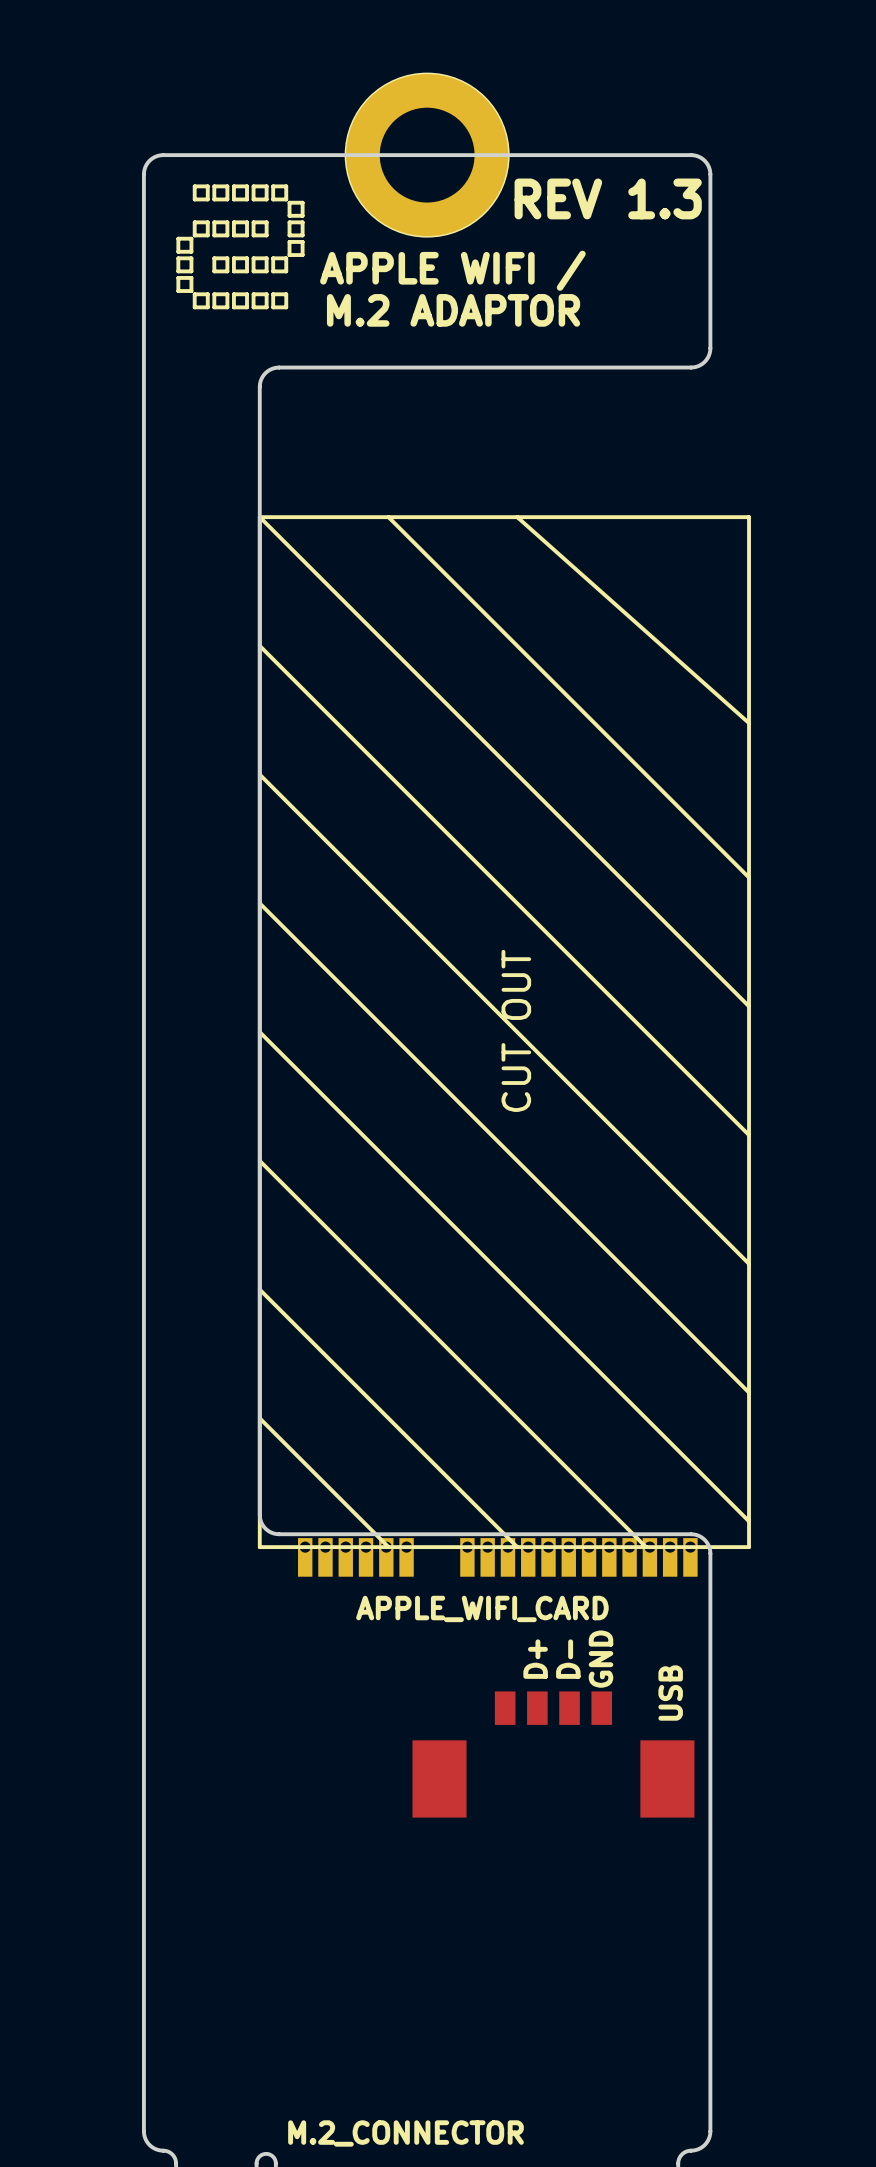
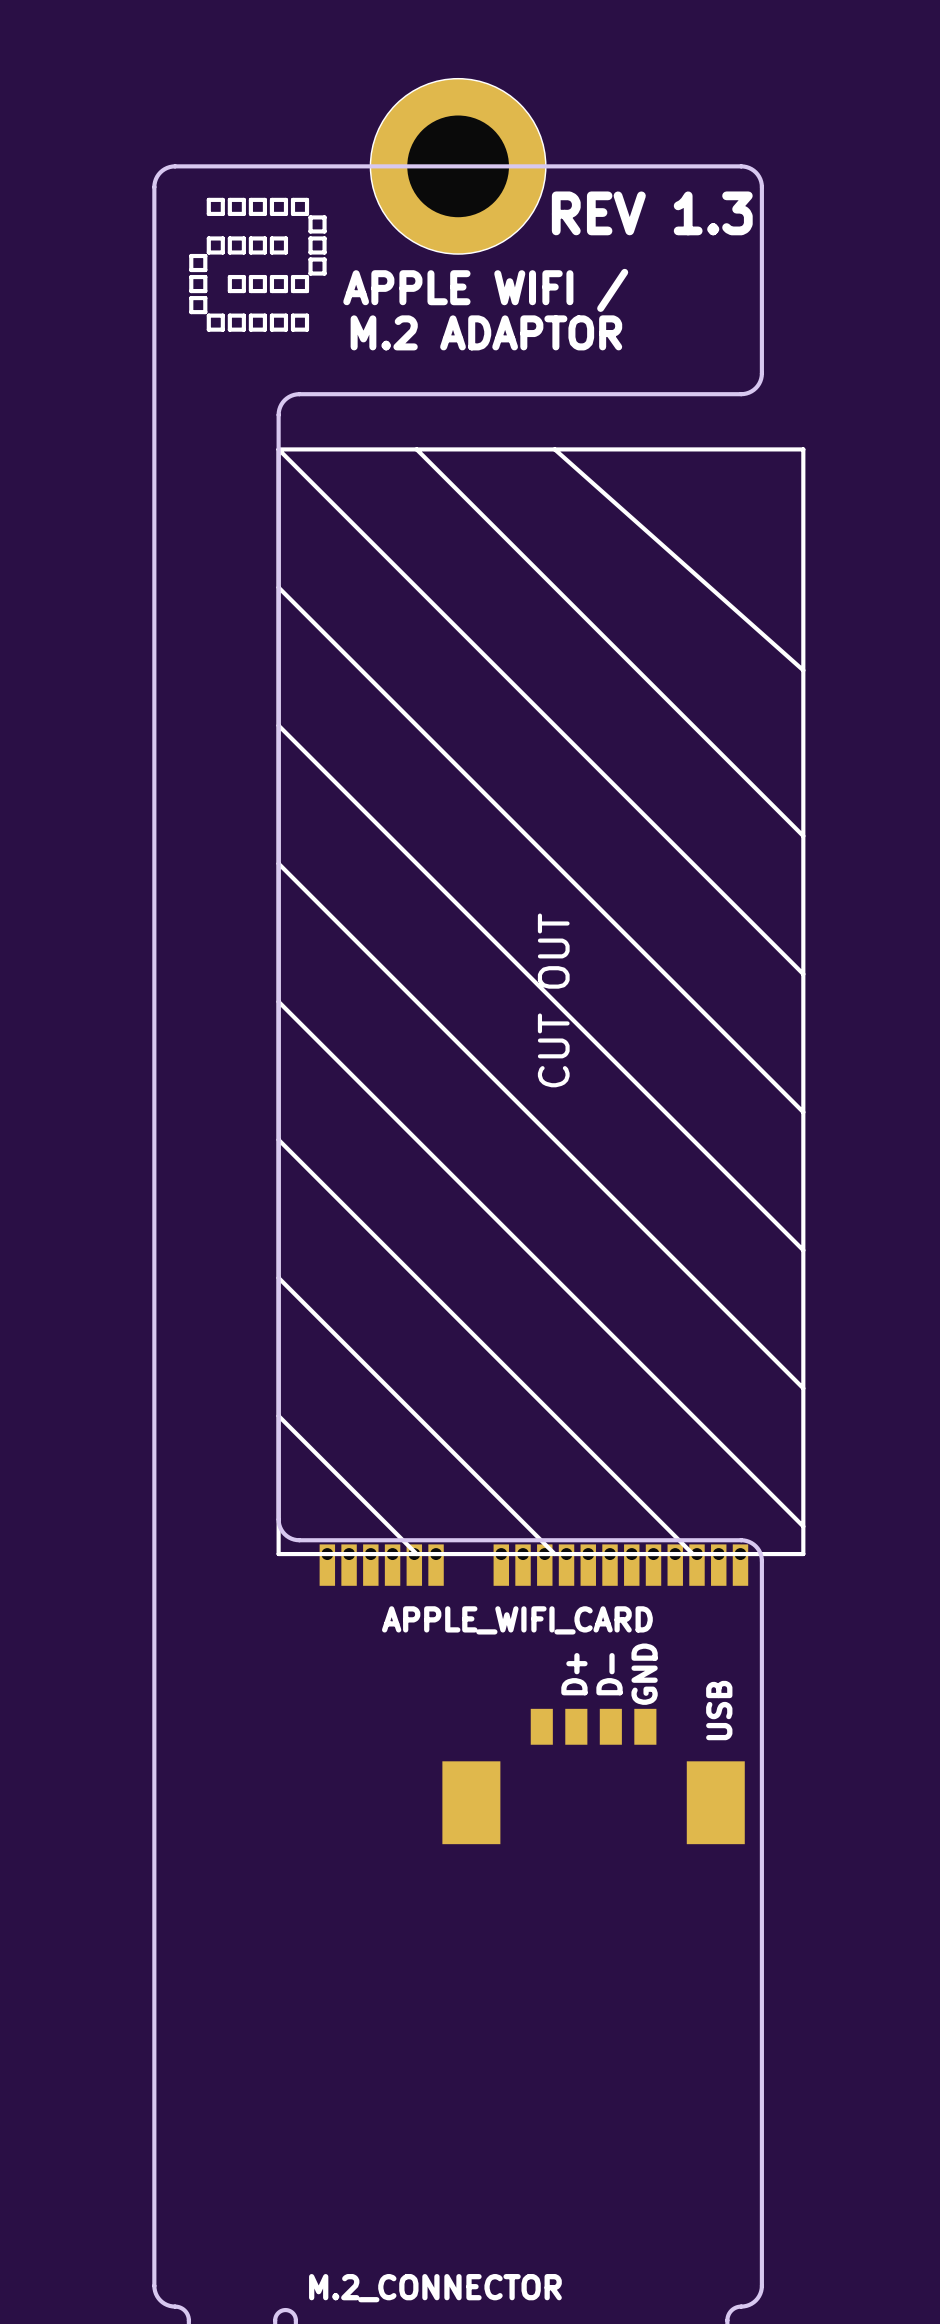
part position: (504, 1045) -> (540, 1016)
board edge: (259, 1416) (259, 1517) (263, 1526) (274, 1533) (691, 1534) (704, 1539) (710, 1553) -> (278, 1519) (280, 1527) (284, 1534) (291, 1538) (299, 1540) (746, 1540) (757, 1548) (761, 1558) (761, 1666)
text position: D+ (535, 1659) -> D+ (574, 1674)
text position: D- (568, 1659) -> D- (609, 1674)
text position: GND (601, 1659) -> GND (644, 1674)
part position: (553, 1754) -> (593, 1776)

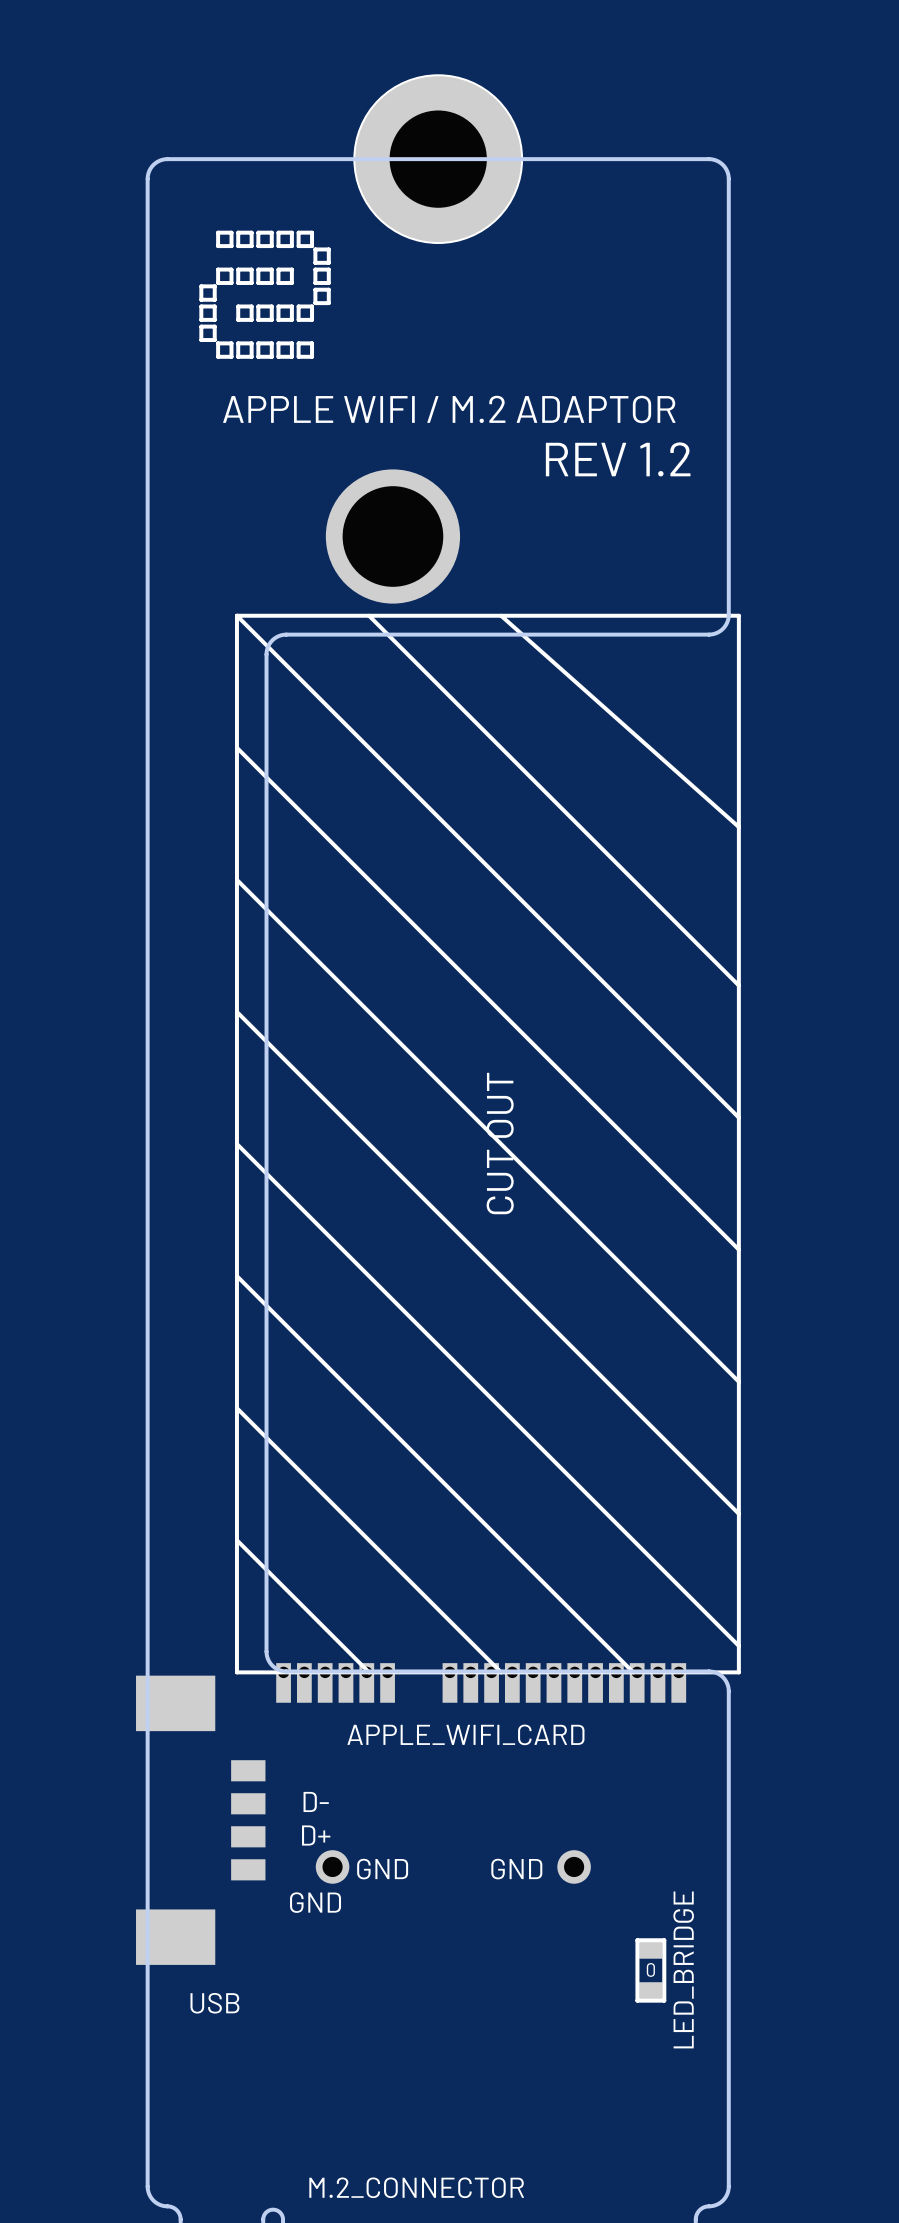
text: REV 1.3 (652, 213) -> none
drawing position: (257, 264) -> (265, 294)
text: APPLE WIFI / (485, 290) -> none
text: M.2 ADAPTOR (486, 332) -> none
board edge: (761, 373) (760, 381) (755, 388) (749, 392) (741, 394) (299, 394) (288, 396) (281, 404) (278, 414) (278, 684) -> (728, 357) (728, 614) (726, 624) (718, 631) (708, 634) (286, 634) (278, 636) (272, 640) (268, 646) (266, 654)
text: none -> APPLE WIFI / M.2 ADAPTOR (449, 409)
text: none -> REV 1.2 (618, 459)
part: APPLE_WIFI_CARD (540, 1016) -> none
part: none -> APPLE_WIFI_CARD (487, 1176)
board edge: (278, 1519) (280, 1527) (284, 1534) (291, 1538) (299, 1540) (741, 1540) (751, 1543) (759, 1550) (761, 1560) (761, 1768) -> (266, 1453) (266, 1651) (269, 1661) (276, 1668) (286, 1671) (708, 1671) (716, 1672) (722, 1677) (727, 1683) (728, 1691)
text rotation: 0° (574, 1674) -> 90° clockwise (316, 1835)
text position: D+ (574, 1674) -> D+ (316, 1835)
text rotation: 0° (609, 1674) -> 90° clockwise (316, 1801)
text position: D- (609, 1674) -> D- (316, 1801)
text: GND (644, 1674) -> none
part value position: USB (719, 1710) -> USB (214, 2003)
part rotation: 0° (593, 1776) -> 90° clockwise (200, 1820)
part position: (593, 1776) -> (200, 1820)
text: none -> GND (382, 1869)
text: none -> GND (516, 1869)
text: none -> GND (315, 1902)
part: none -> 0 (650, 1970)
text: none -> LED_BRIDGE (683, 1969)

